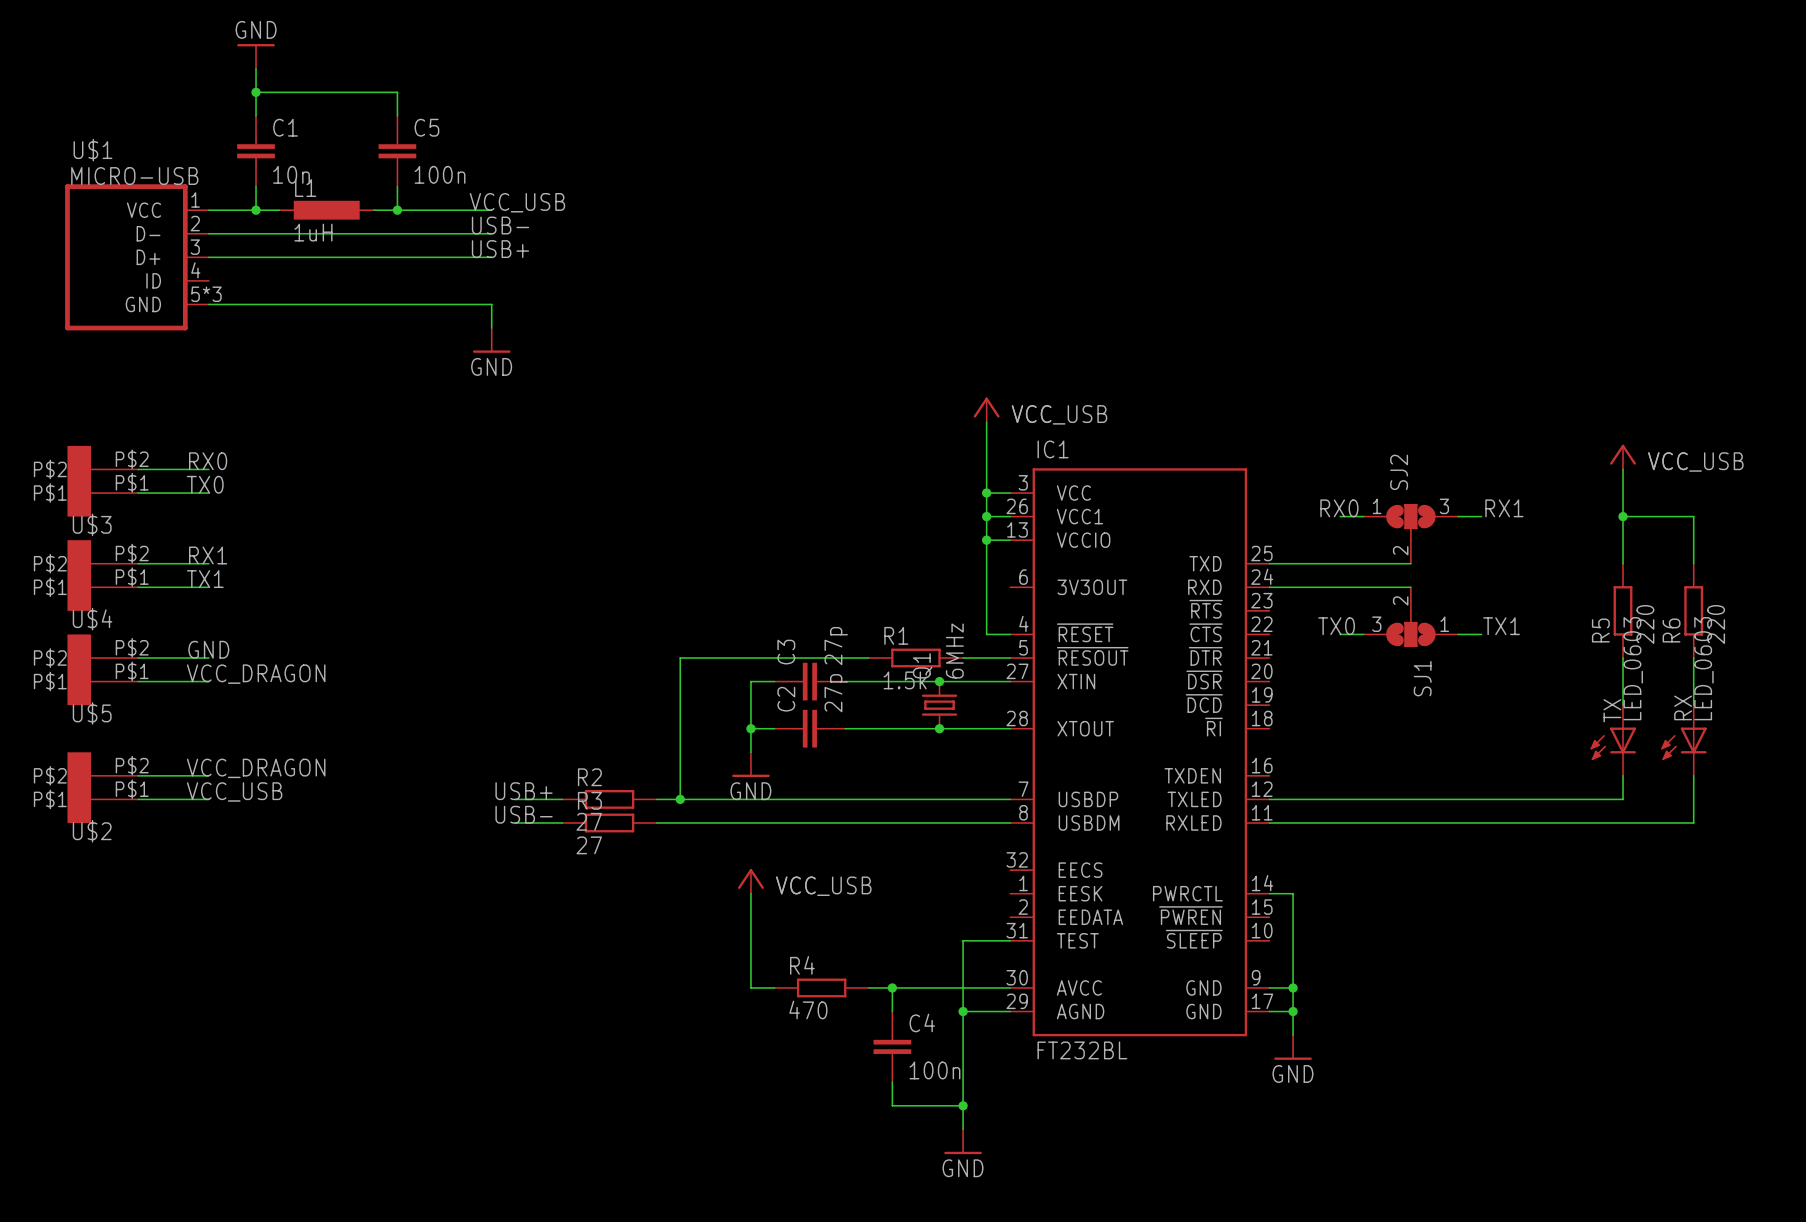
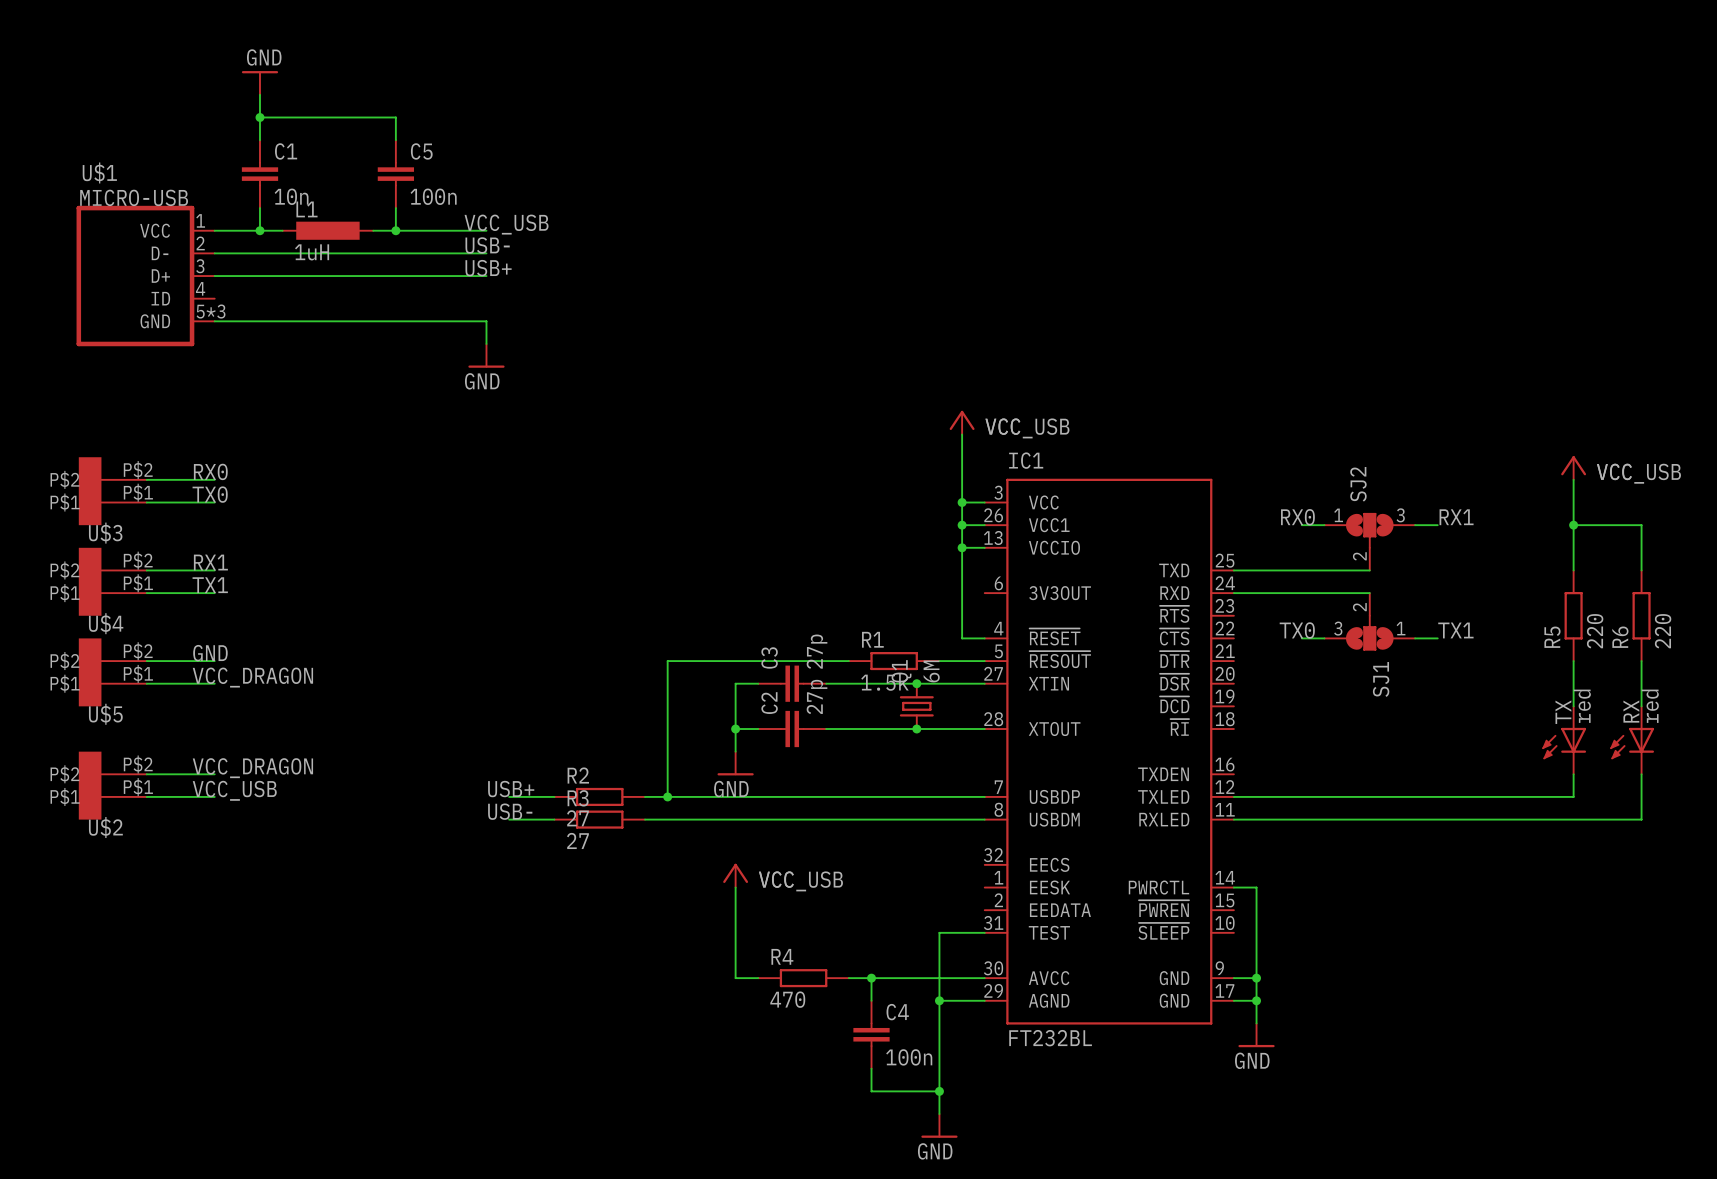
Q1 value: 6MHz (954, 651) -> 6M (931, 671)
TX value: LED_0603 (1633, 668) -> red (1582, 706)
RX value: LED_0603 (1703, 668) -> red (1650, 706)

